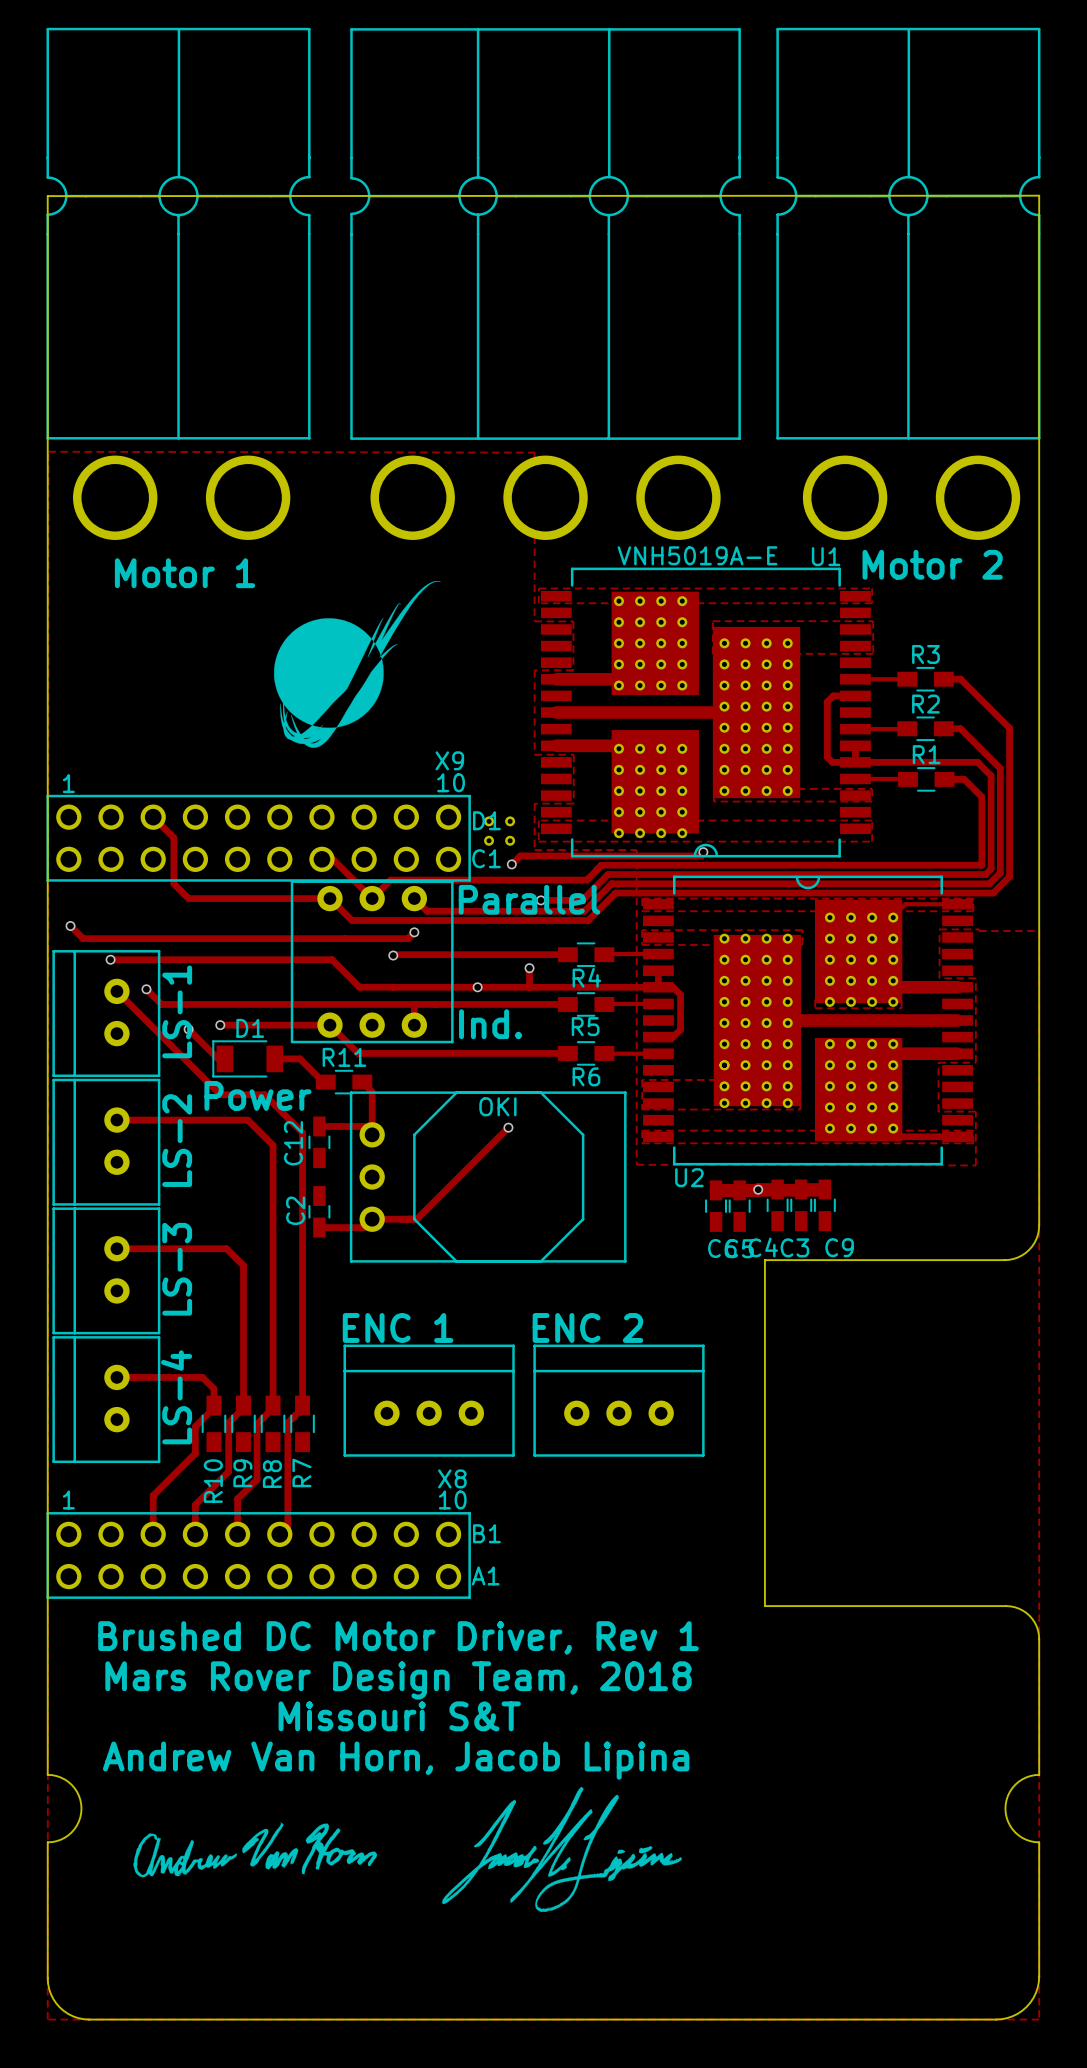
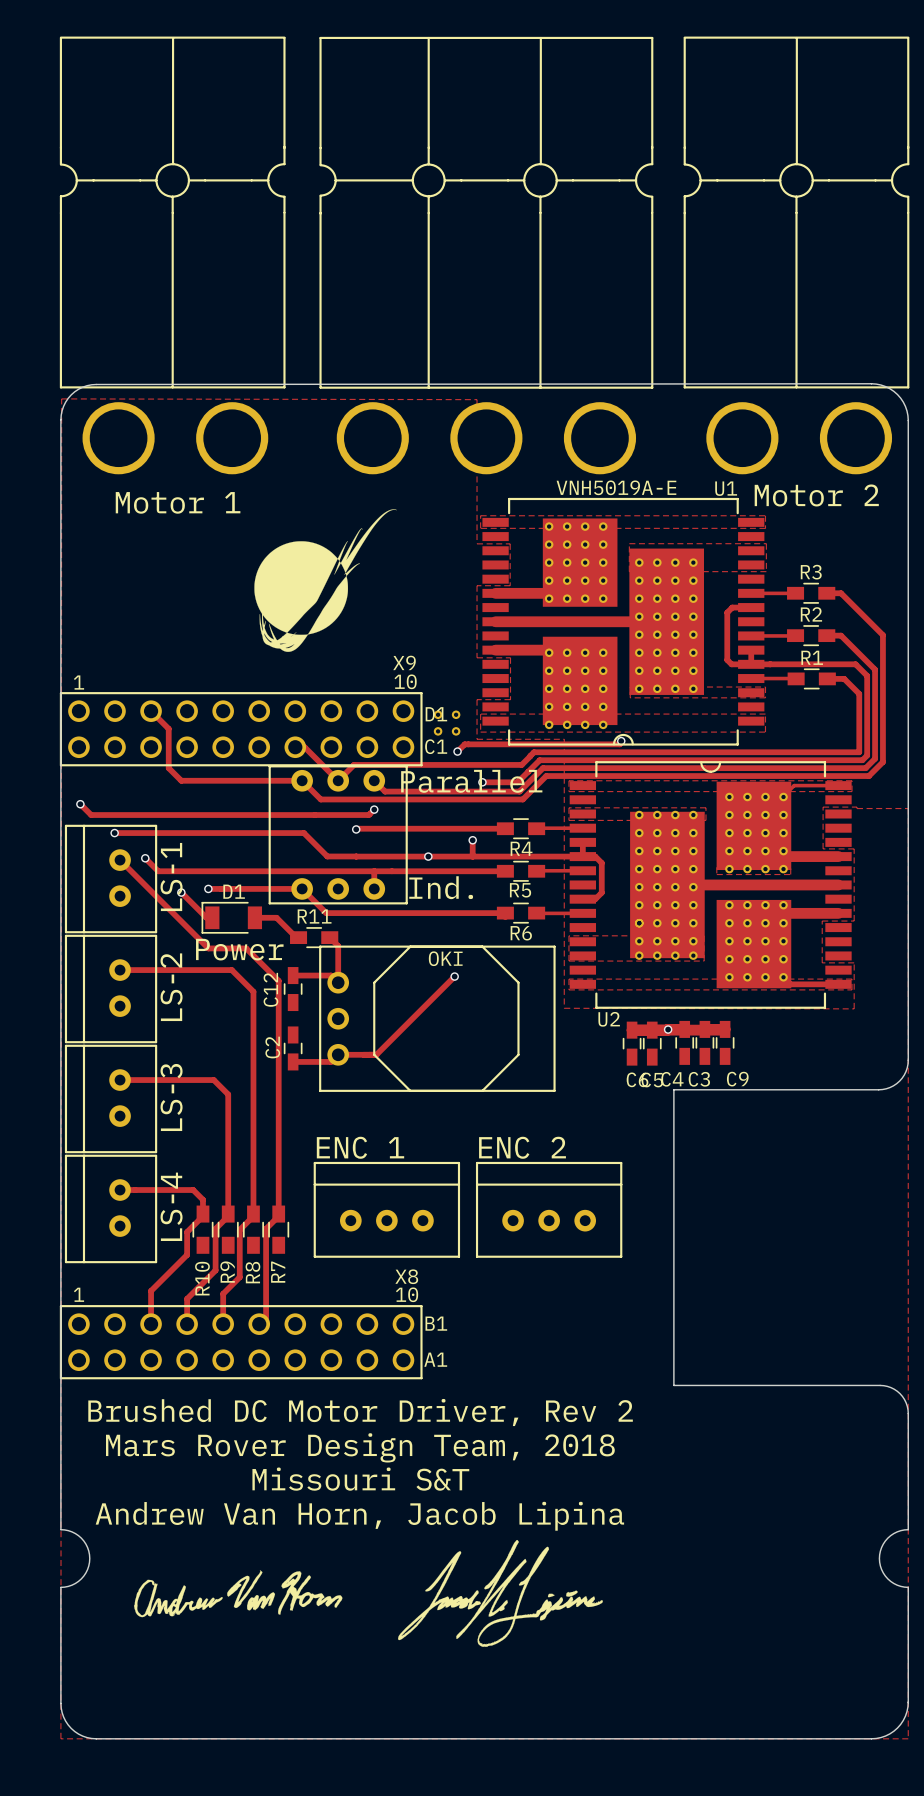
board edge: (47, 476) (47, 196) (1039, 195) (1039, 477) -> (60, 419) (63, 406) (71, 394) (82, 387) (96, 384) (871, 383) (885, 386) (897, 394) (905, 406) (908, 420)
text: Brushed DC Motor Driver, Rev 1 (398, 1637) -> Brushed DC Motor Driver, Rev 2 (360, 1412)

